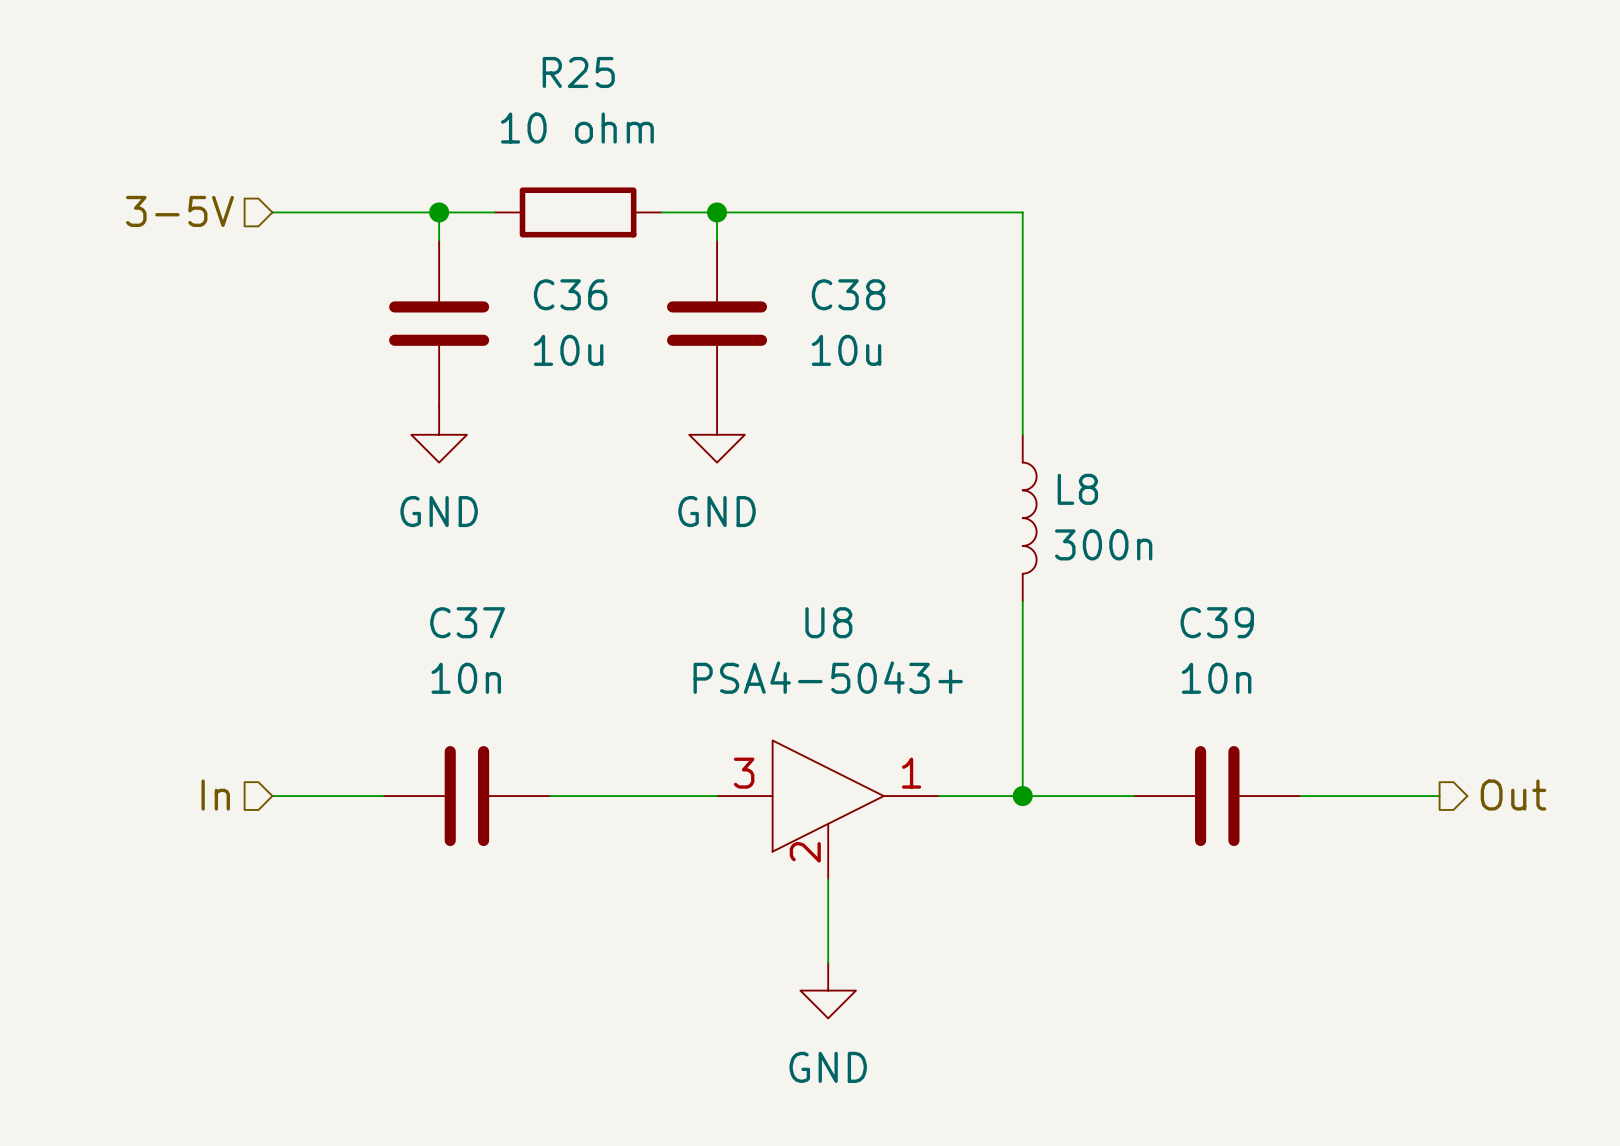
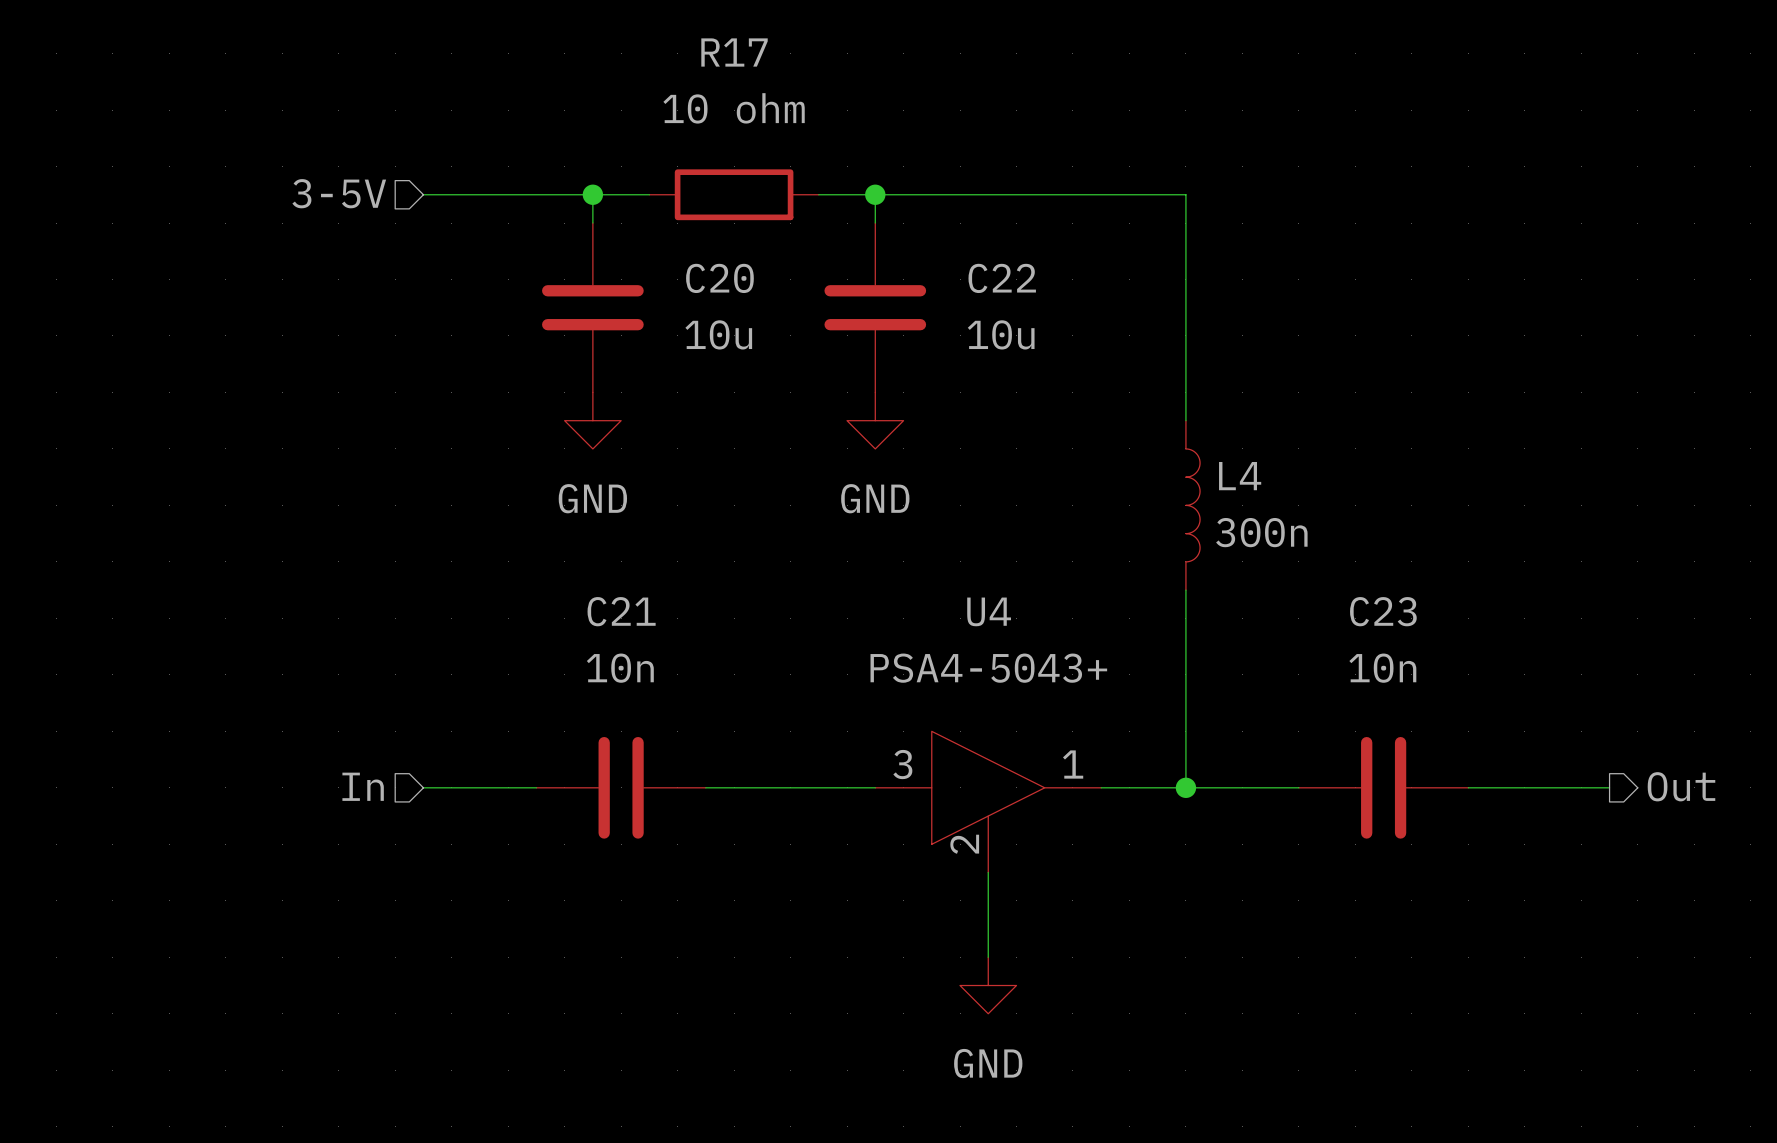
R25 name: R25 (578, 72) -> R17 (734, 52)
C36 name: C36 (570, 294) -> C20 (719, 278)
C38 name: C38 (848, 294) -> C22 (1002, 278)
L8 name: L8 (1077, 489) -> L4 (1240, 476)
C37 name: C37 (467, 622) -> C21 (621, 611)
U8 name: U8 (828, 622) -> U4 (989, 611)
C39 name: C39 (1217, 622) -> C23 (1383, 611)

